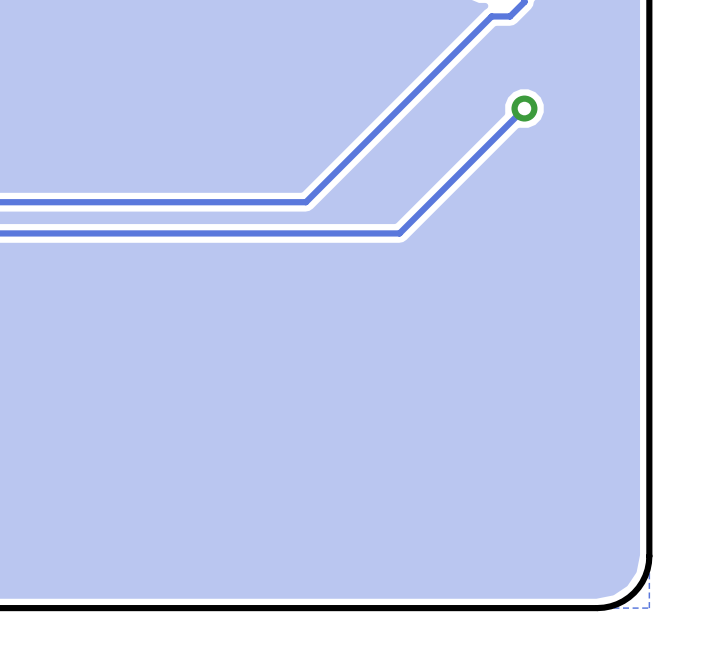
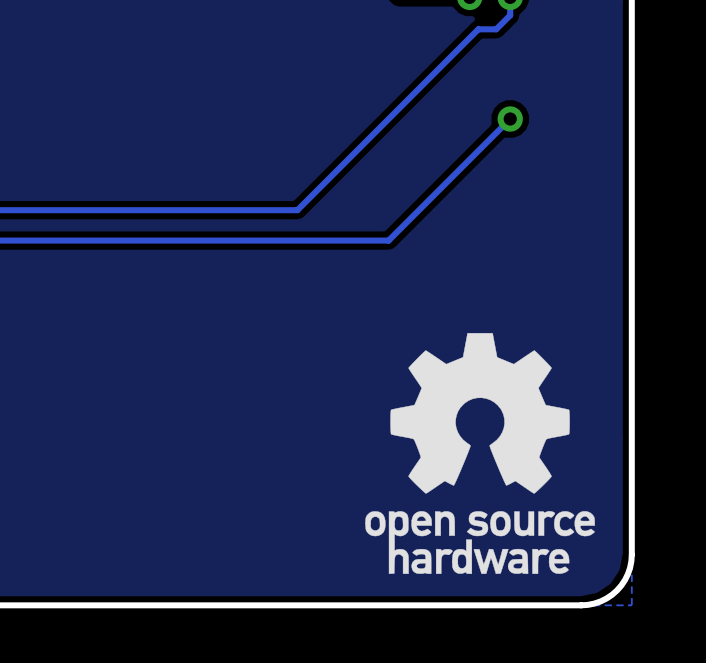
drawing: none -> [365, 333, 595, 574]

